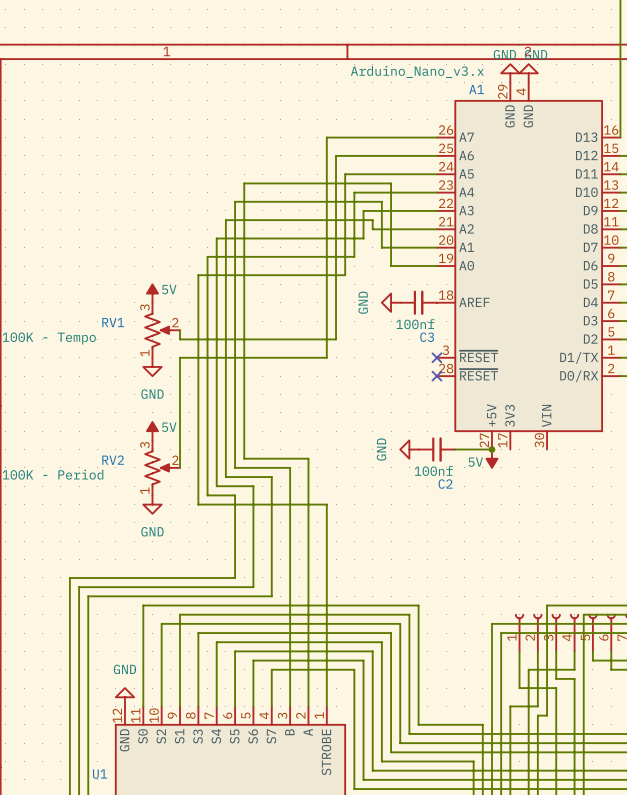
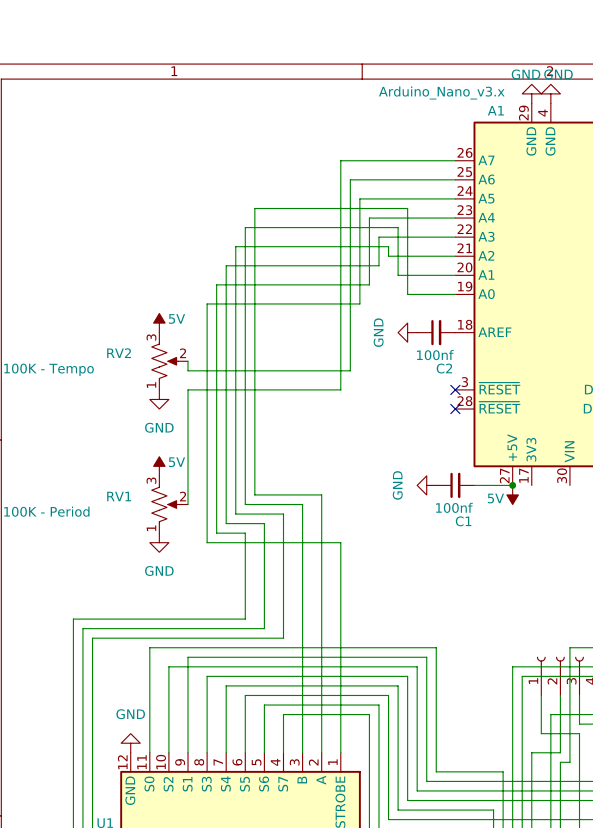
RV1 name: RV1 (113, 322) -> RV2 (119, 353)
C3 name: C3 (427, 337) -> C2 (444, 368)
RV2 name: RV2 (113, 460) -> RV1 (119, 496)
C2 name: C2 (445, 484) -> C1 (463, 521)

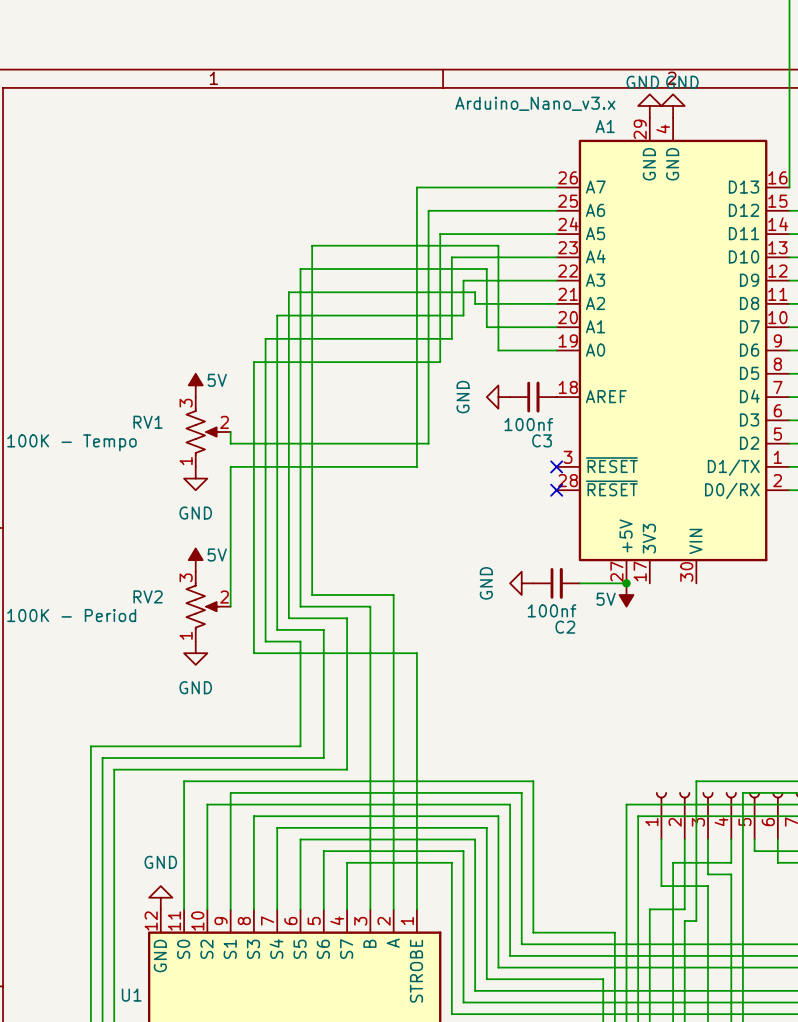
RV2 name: RV2 (119, 353) -> RV1 (148, 422)
C2 name: C2 (444, 368) -> C3 (542, 440)
RV1 name: RV1 (119, 496) -> RV2 (148, 596)
C1 name: C1 (463, 521) -> C2 (565, 627)

